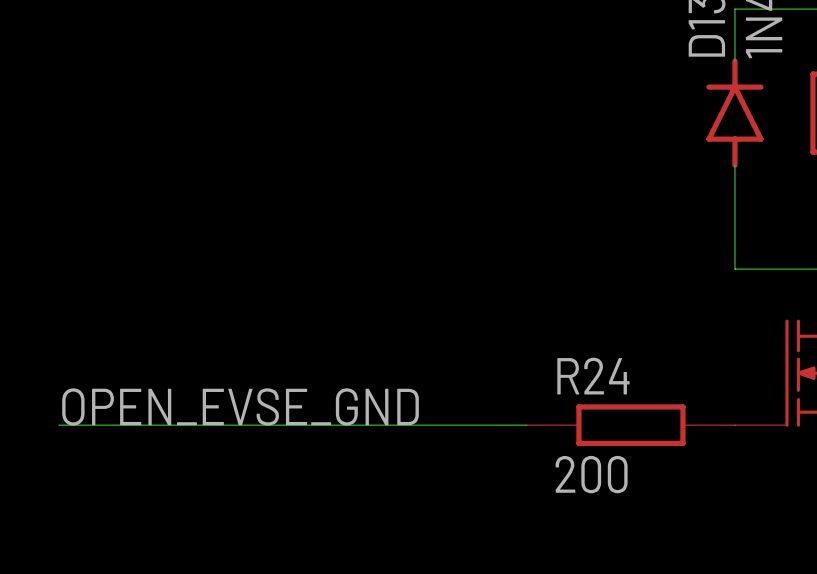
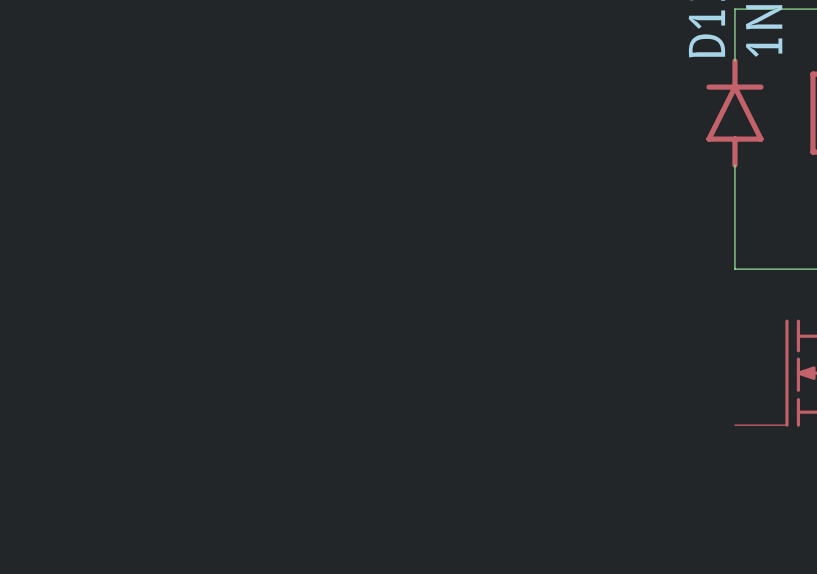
label: OPEN_EVSE_GND (240, 406) -> none
wire: (58, 425) (526, 425) -> none
R24: 200 (630, 425) -> none

